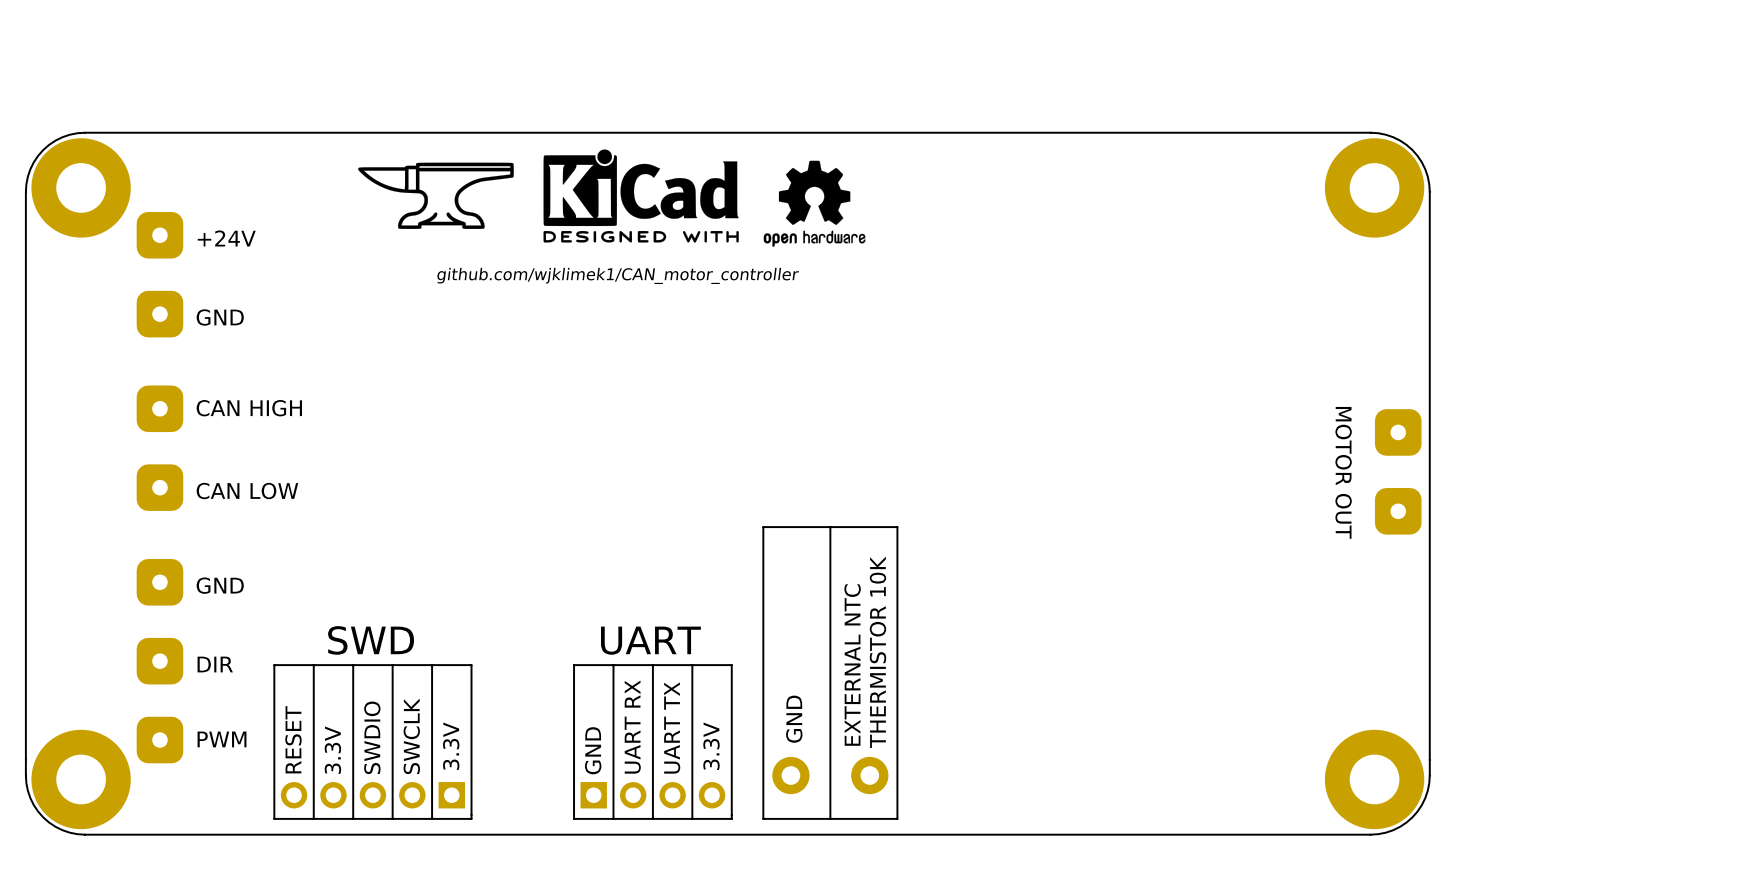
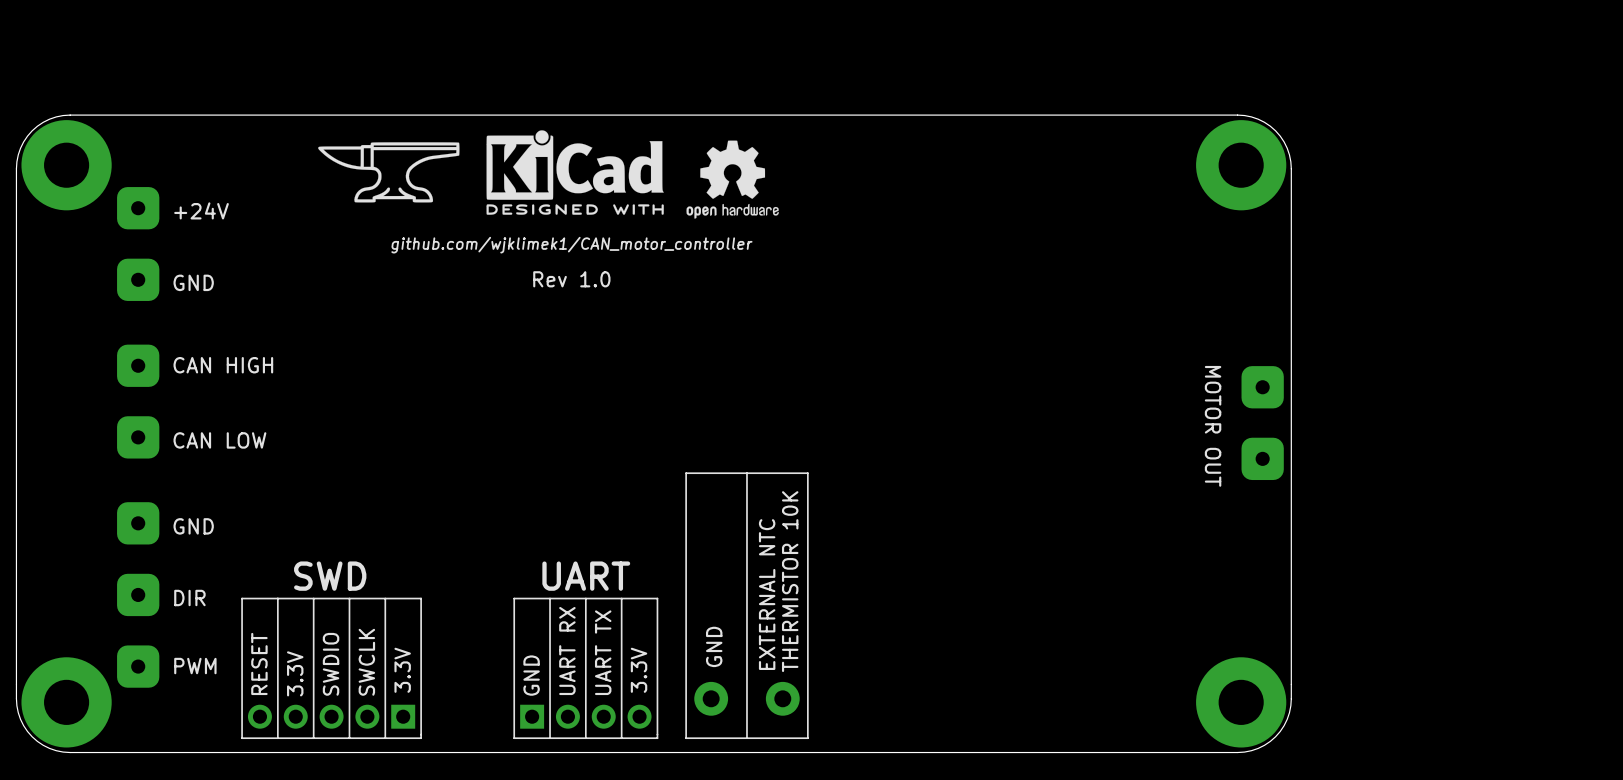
text: none -> Rev 1.0 (571, 279)

